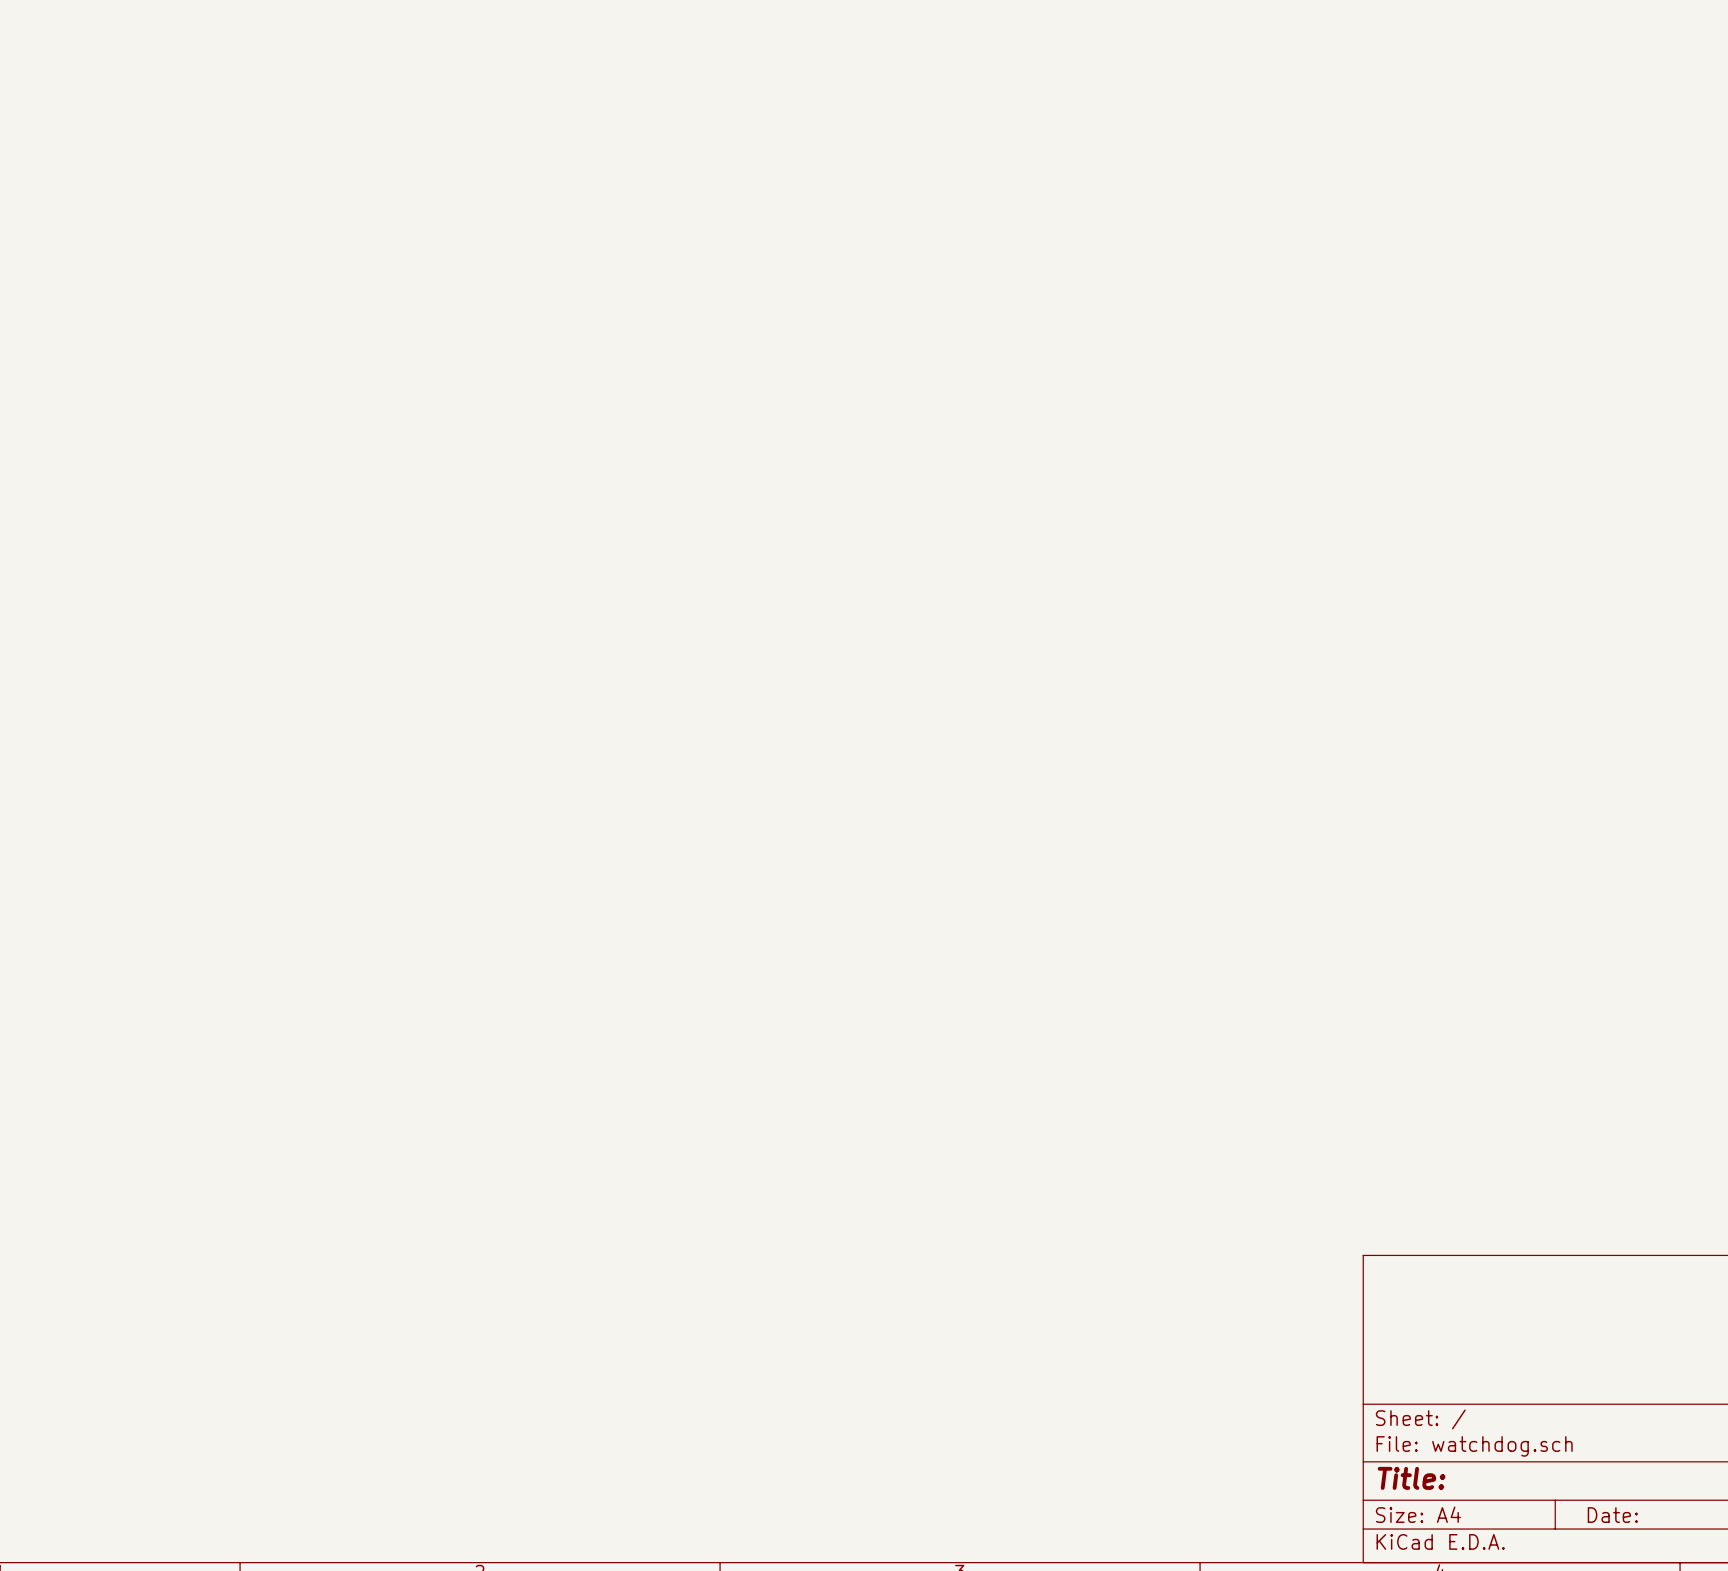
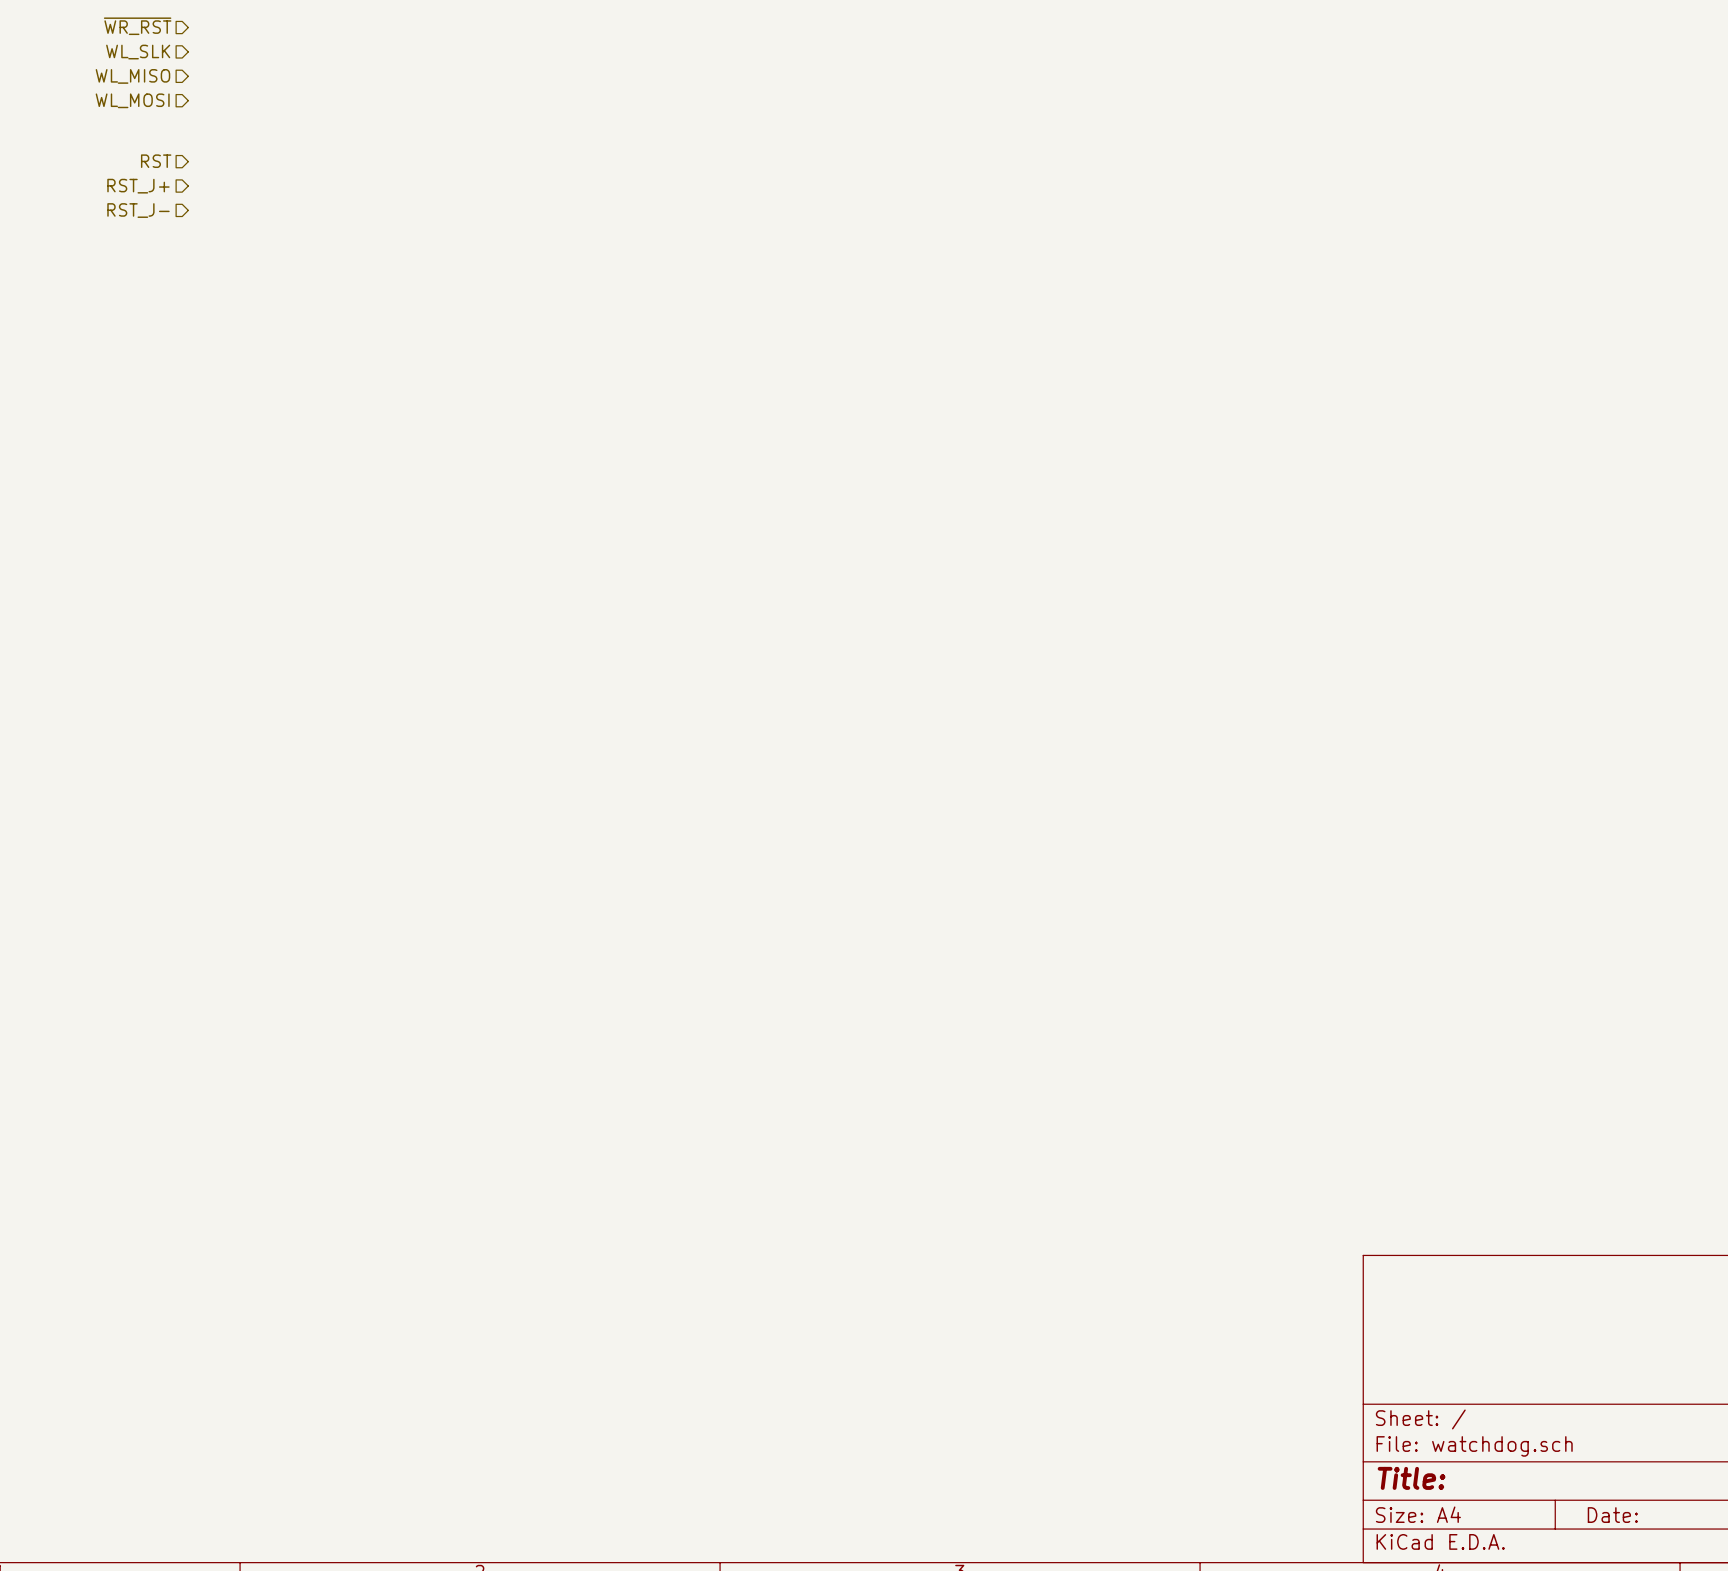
hierarchical label: none -> ~{WR_RST} (137, 26)
hierarchical label: none -> WL_SLK (138, 52)
hierarchical label: none -> WL_MISO (132, 76)
hierarchical label: none -> WL_MOSI (132, 100)
hierarchical label: none -> RST (156, 161)
hierarchical label: none -> RST_J+ (138, 186)
hierarchical label: none -> RST_J- (138, 210)

